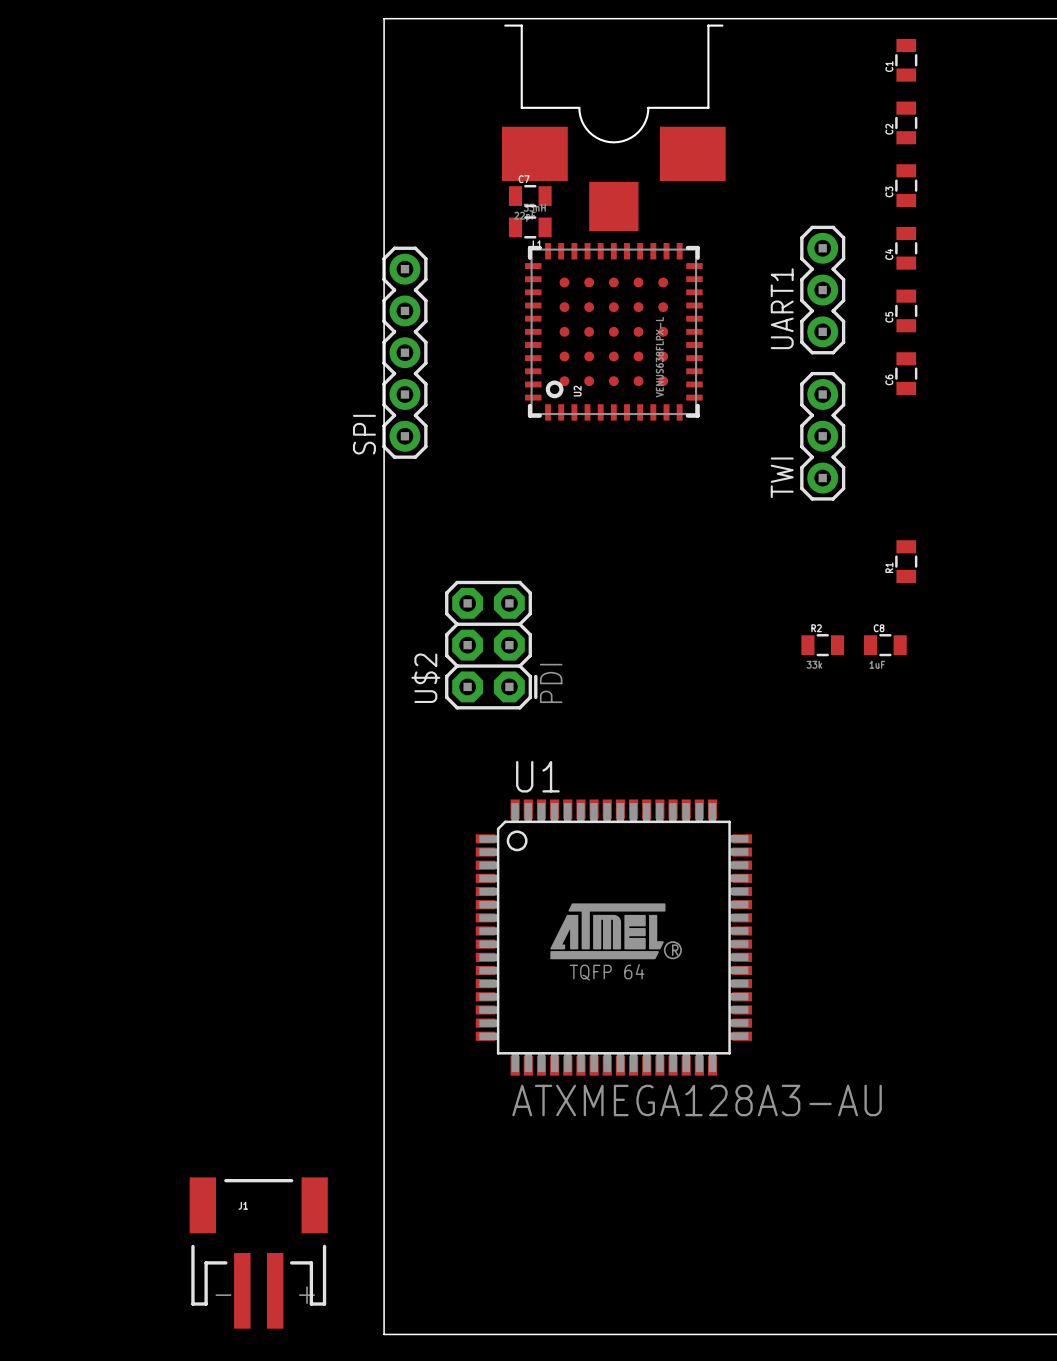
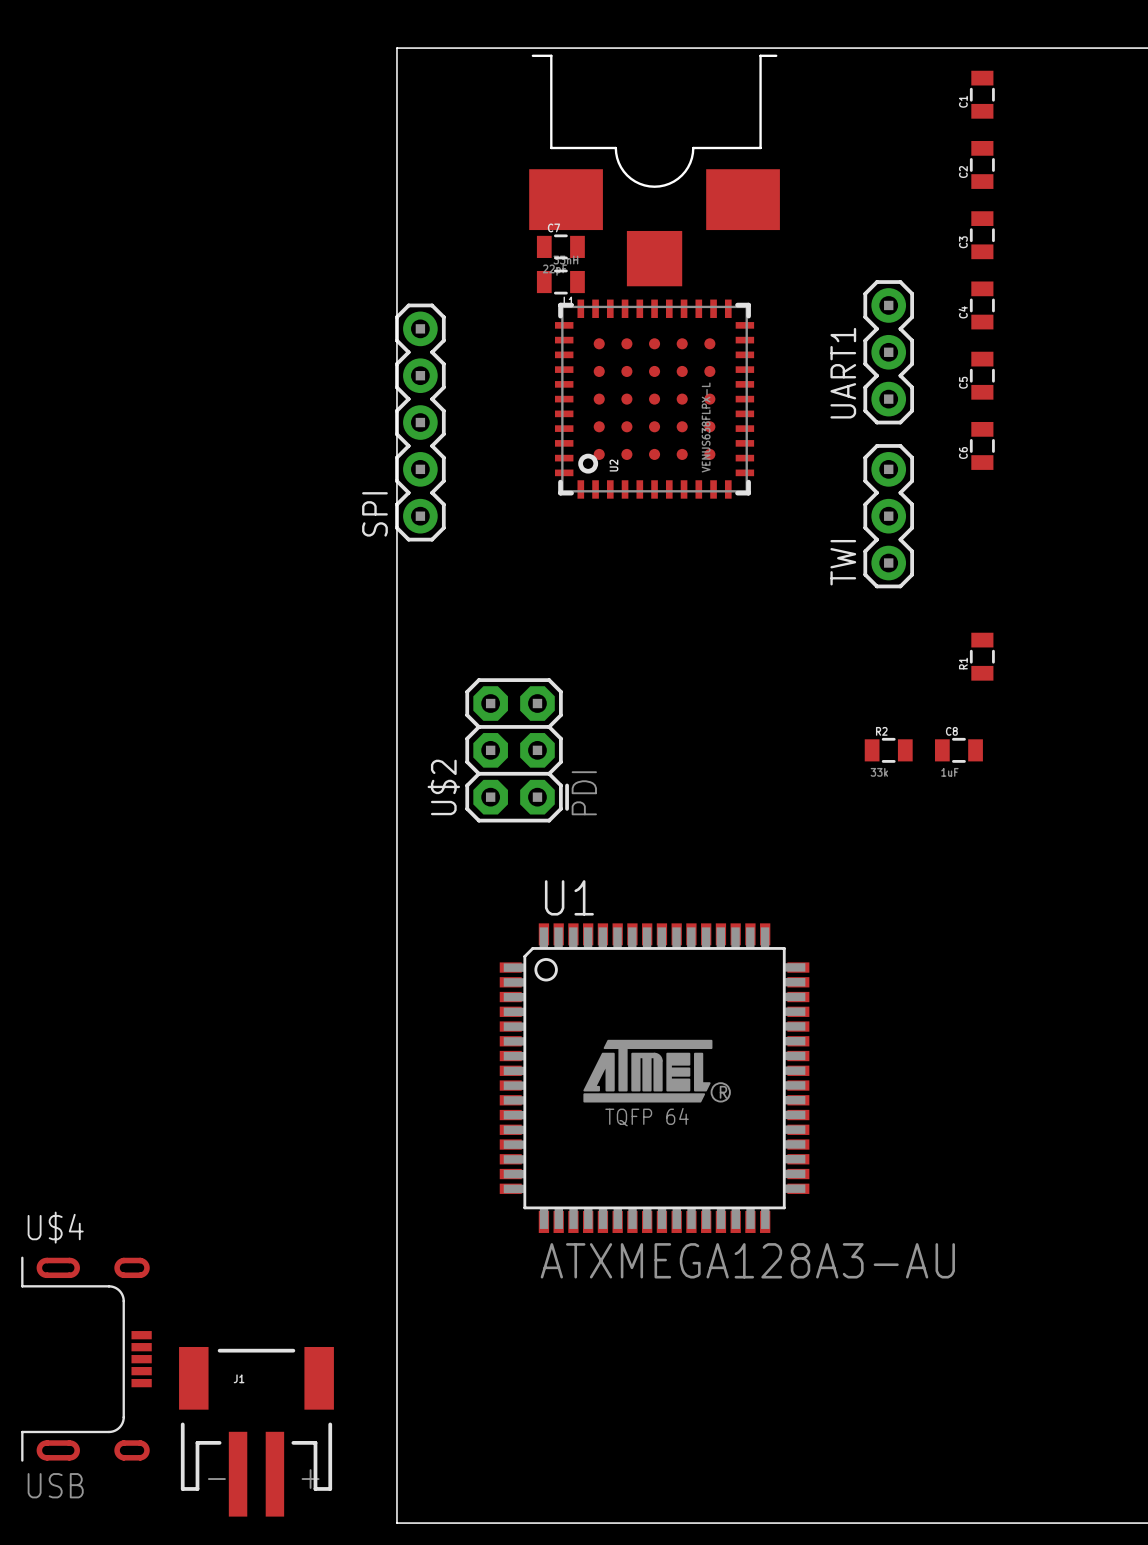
U$4: none -> USB (86, 1359)

